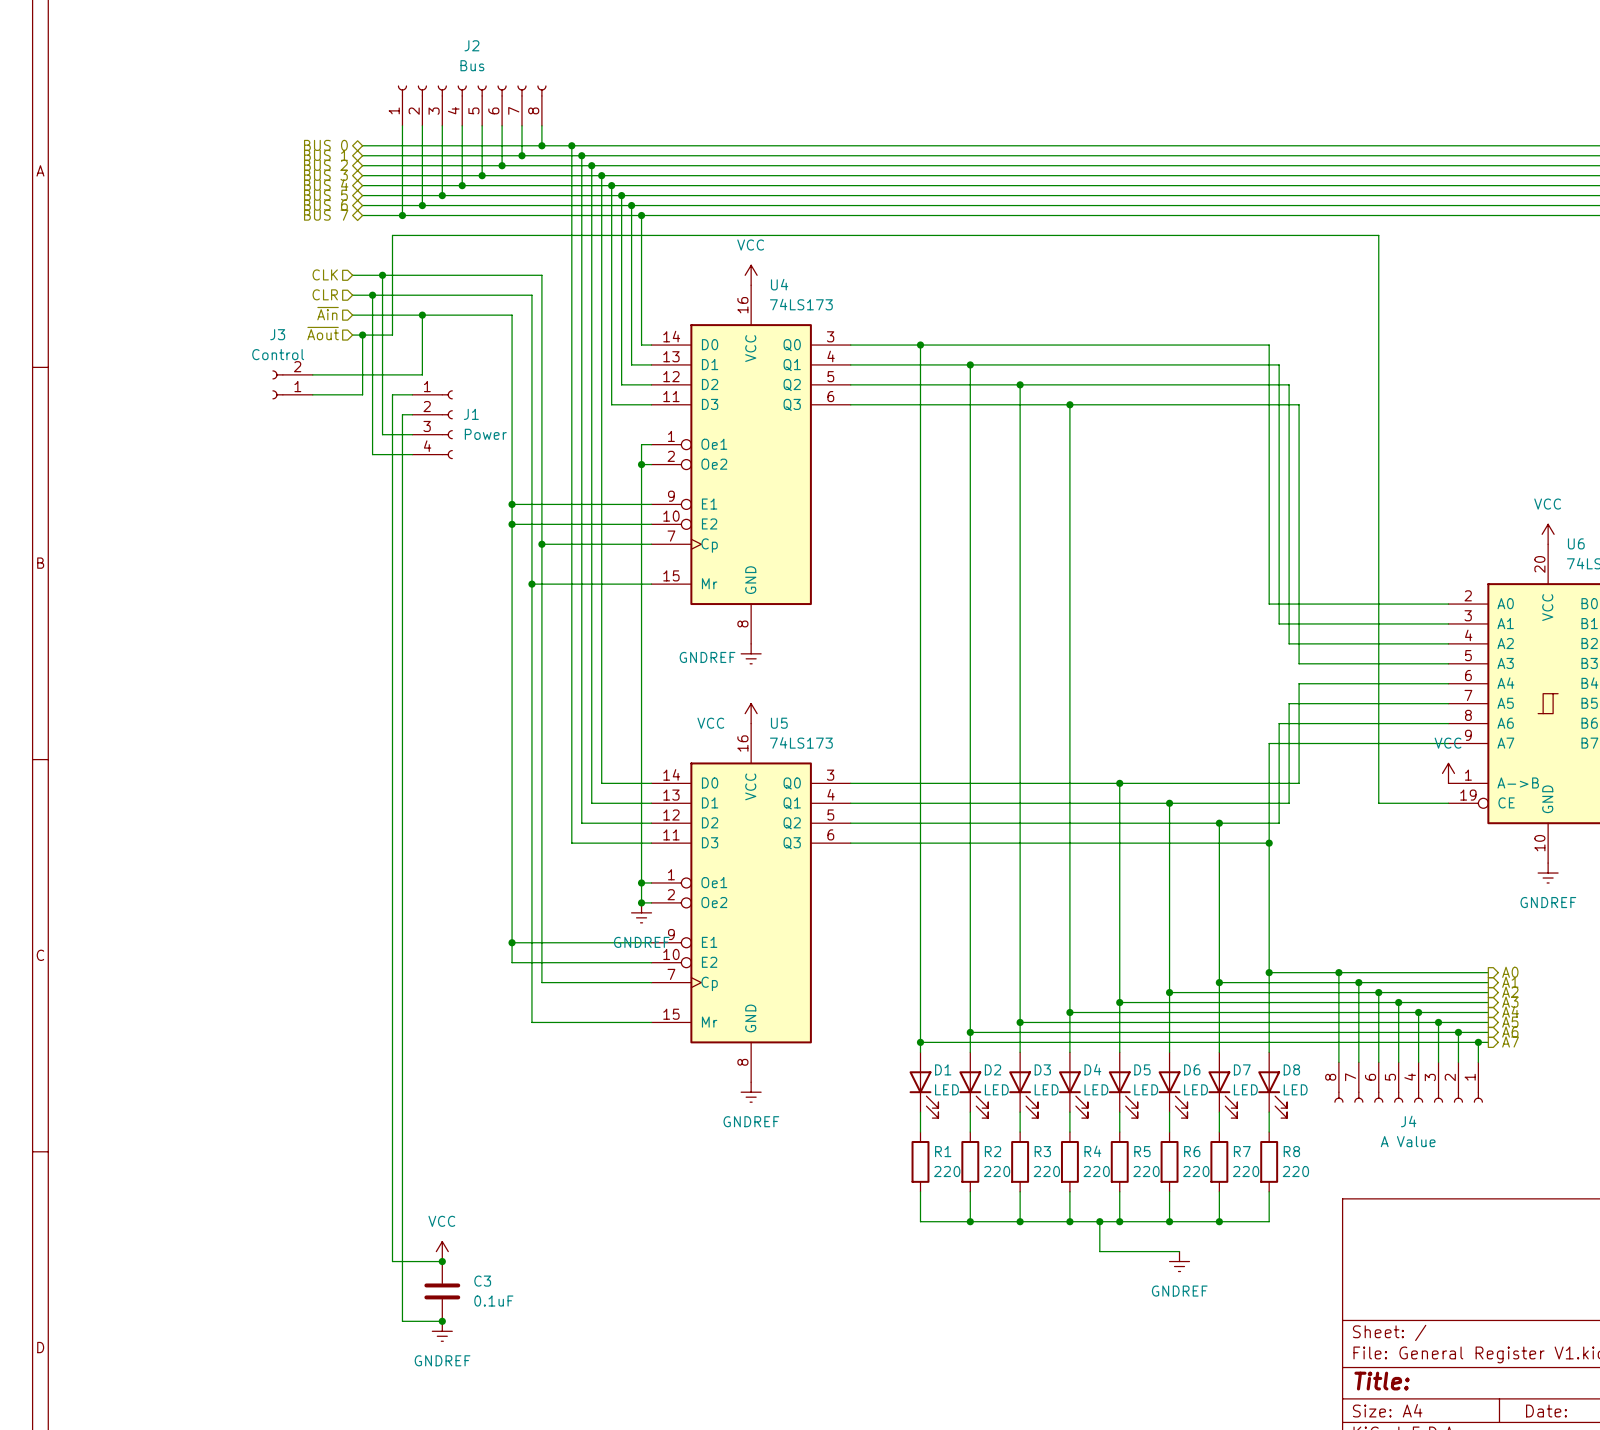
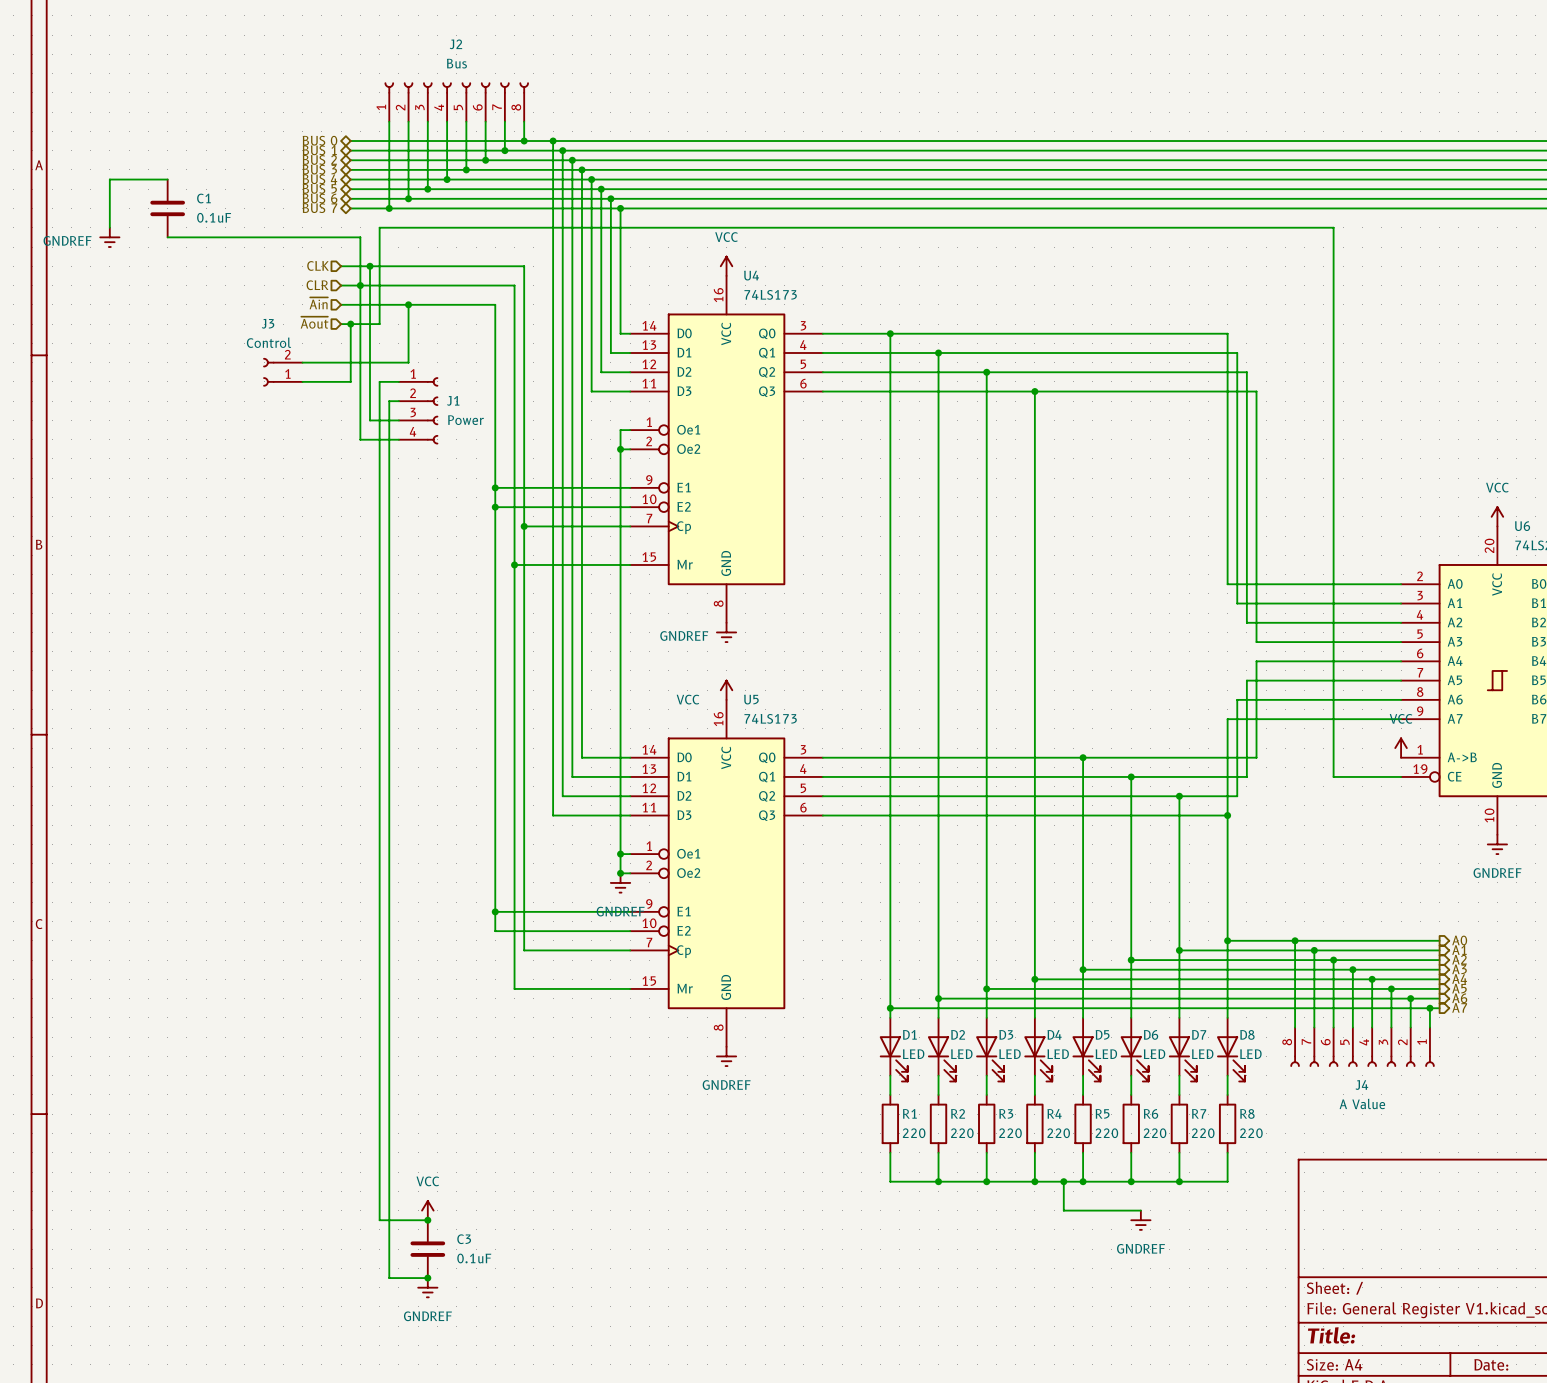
wire: none -> (167, 179) (109, 179) (109, 227)
C1: none -> 0.1uF (167, 208)
power symbol: none -> GNDREF (109, 237)
wire: none -> (167, 237) (360, 237) (360, 285)

